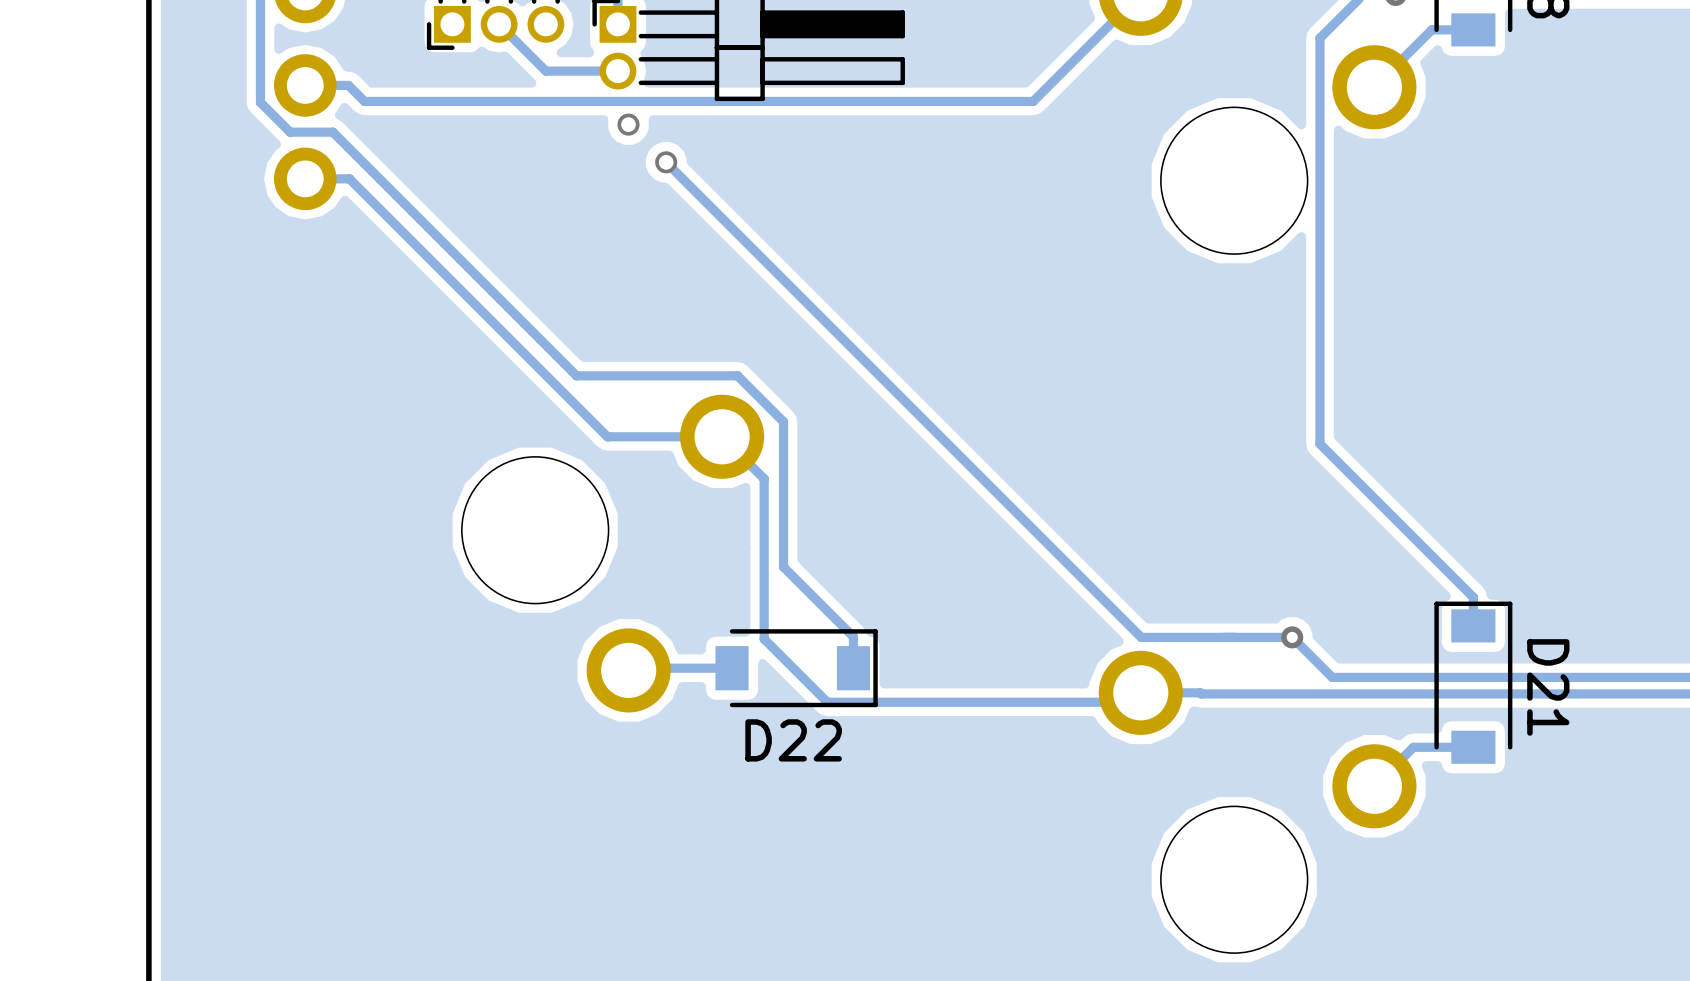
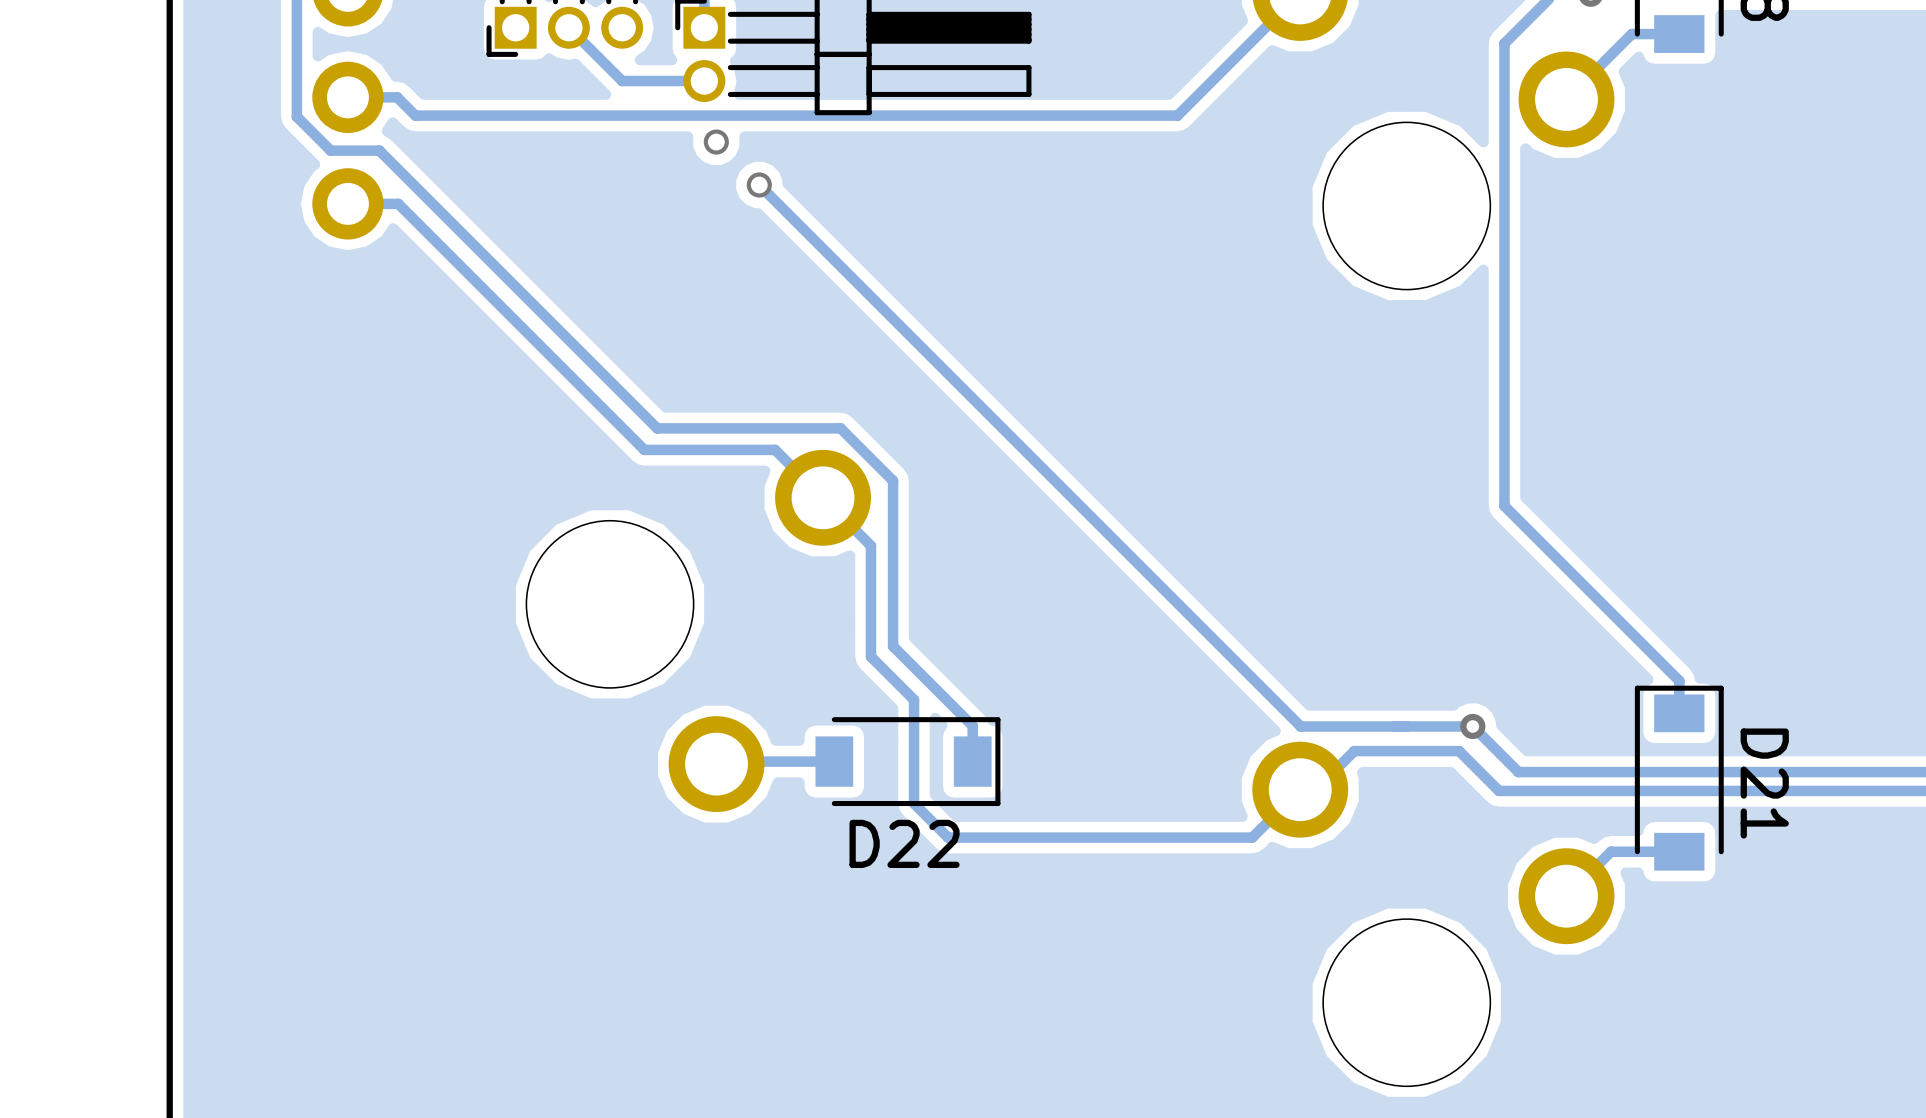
track: (565, 394) (607, 436) (722, 436) -> (644, 449) (775, 449) (823, 497)
track: (764, 576) (764, 639) (827, 702) (1131, 702) -> (870, 656) (914, 699) (914, 803) (948, 837) (1252, 837) (1289, 800)
track: (1154, 692) (1315, 693) -> (1315, 789) (1354, 751) (1459, 751) (1498, 790)

